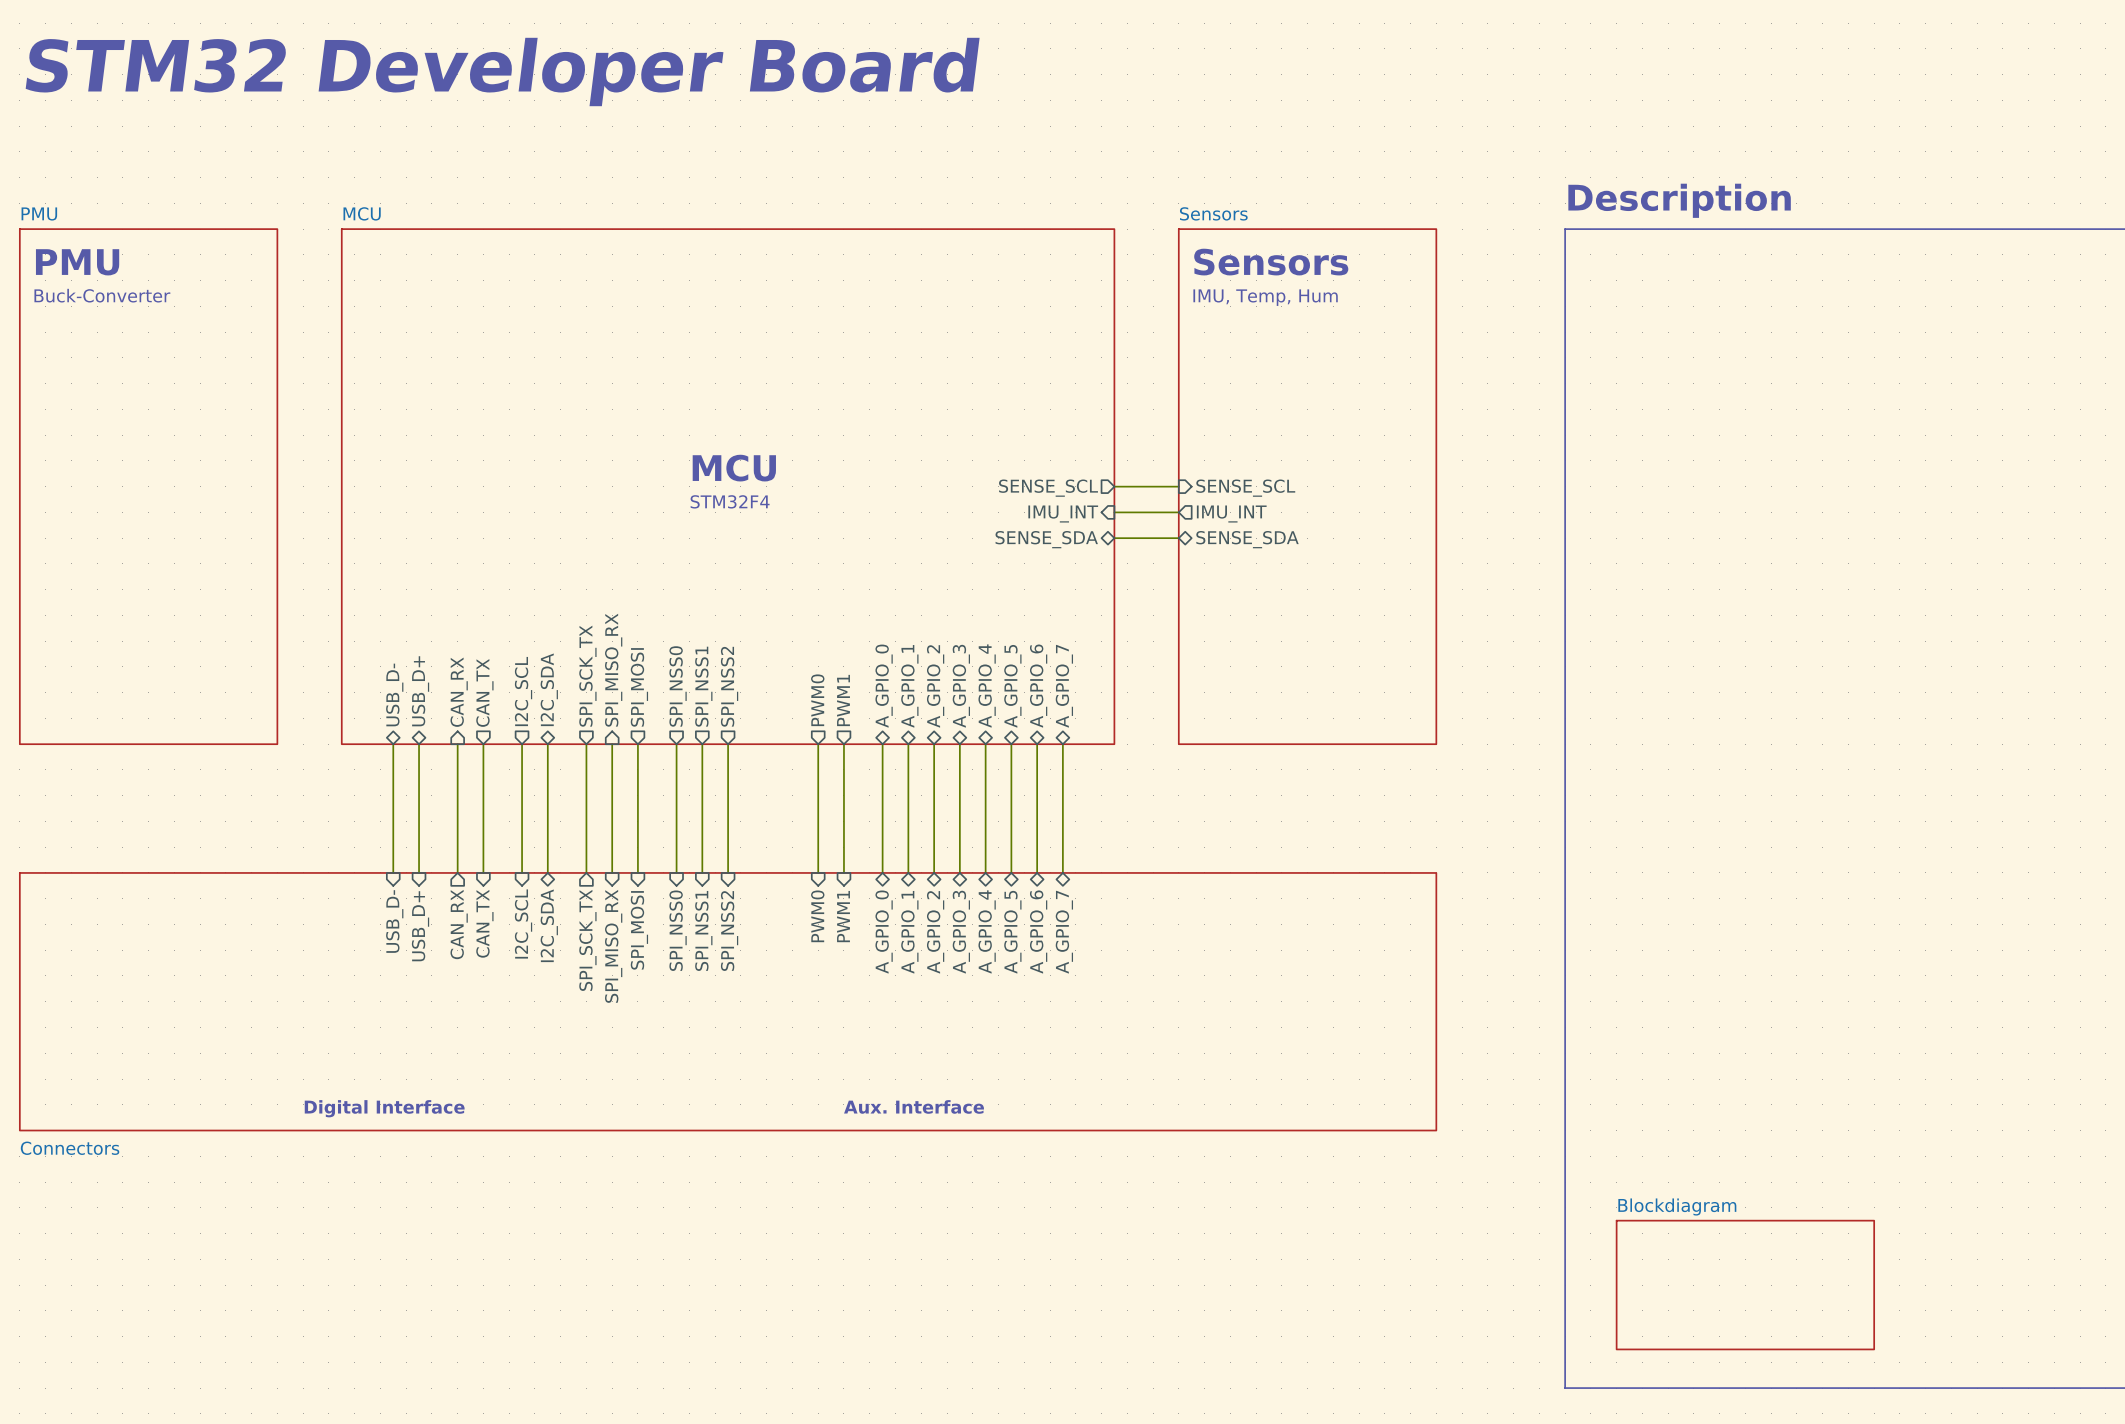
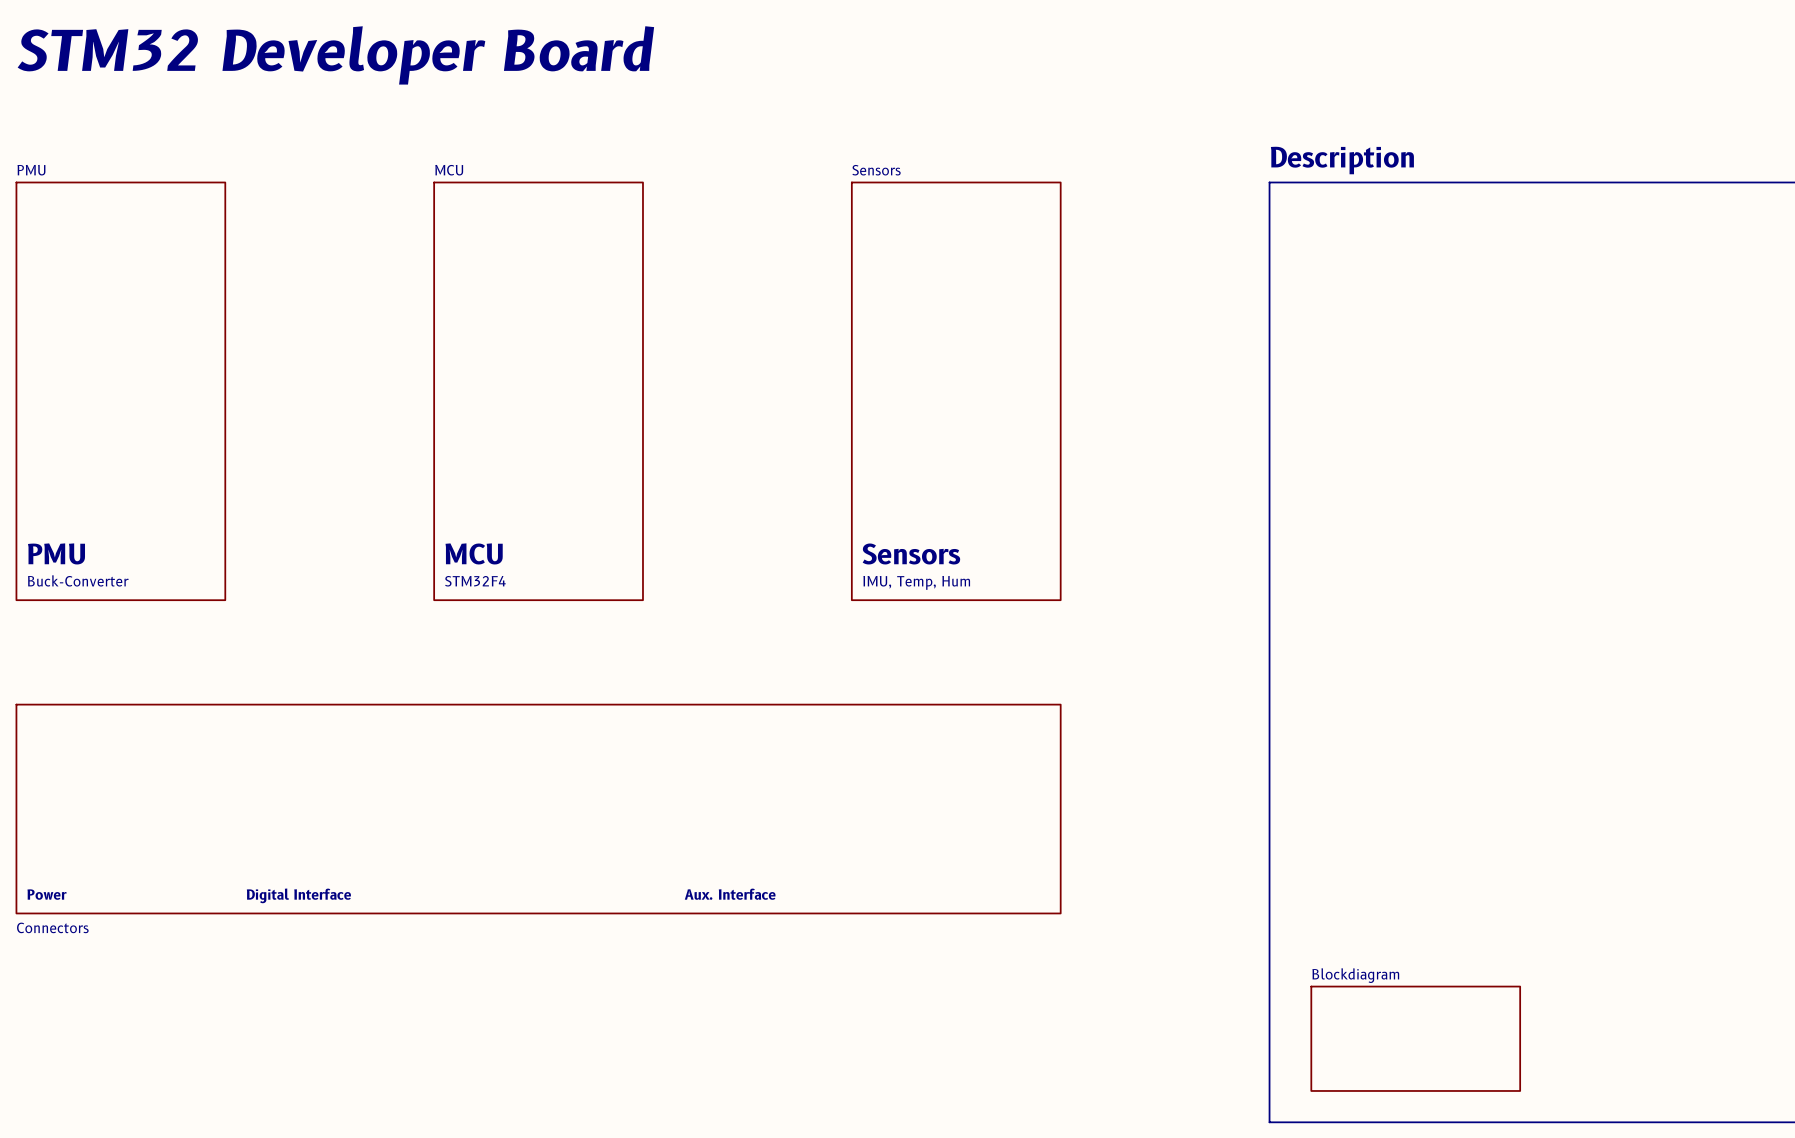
text: PMU (77, 262) -> none
text: Sensors (1271, 262) -> none
text: Buck-Converter (102, 295) -> none
text: IMU, Temp, Hum (1265, 297) -> none
text: MCU (734, 468) -> none
sheet MCU: none -> (538, 391)
sheet MCU: (728, 486) -> none
wire: (1114, 486) (1178, 486) -> none
sheet Sensors position: (1307, 486) -> (956, 391)
sheet pin: SENSE_SCL (1048, 488) -> none
sheet pin: SENSE_SCL (1245, 488) -> none
text: STM32F4 (730, 501) -> none
wire: (1114, 512) (1178, 512) -> none
sheet pin: IMU_INT (1063, 514) -> none
sheet pin: IMU_INT (1231, 514) -> none
wire: (1114, 538) (1178, 538) -> none
sheet pin: SENSE_SDA (1046, 539) -> none
sheet pin: SENSE_SDA (1247, 539) -> none
sheet pin: SPI_MISO_RX (613, 670) -> none
sheet pin: SPI_SCK_TX (587, 676) -> none
sheet pin: SPI_NSS0 (678, 686) -> none
sheet pin: SPI_NSS1 (703, 686) -> none
sheet pin: SPI_NSS2 (729, 686) -> none
sheet pin: A_GPIO_0 (884, 686) -> none
sheet pin: A_GPIO_1 (909, 686) -> none
sheet pin: A_GPIO_2 (935, 686) -> none
sheet pin: A_GPIO_3 (961, 686) -> none
sheet pin: A_GPIO_4 (987, 686) -> none
sheet pin: A_GPIO_5 (1012, 686) -> none
sheet pin: A_GPIO_6 (1038, 686) -> none
sheet pin: A_GPIO_7 (1064, 686) -> none
text: none -> PMU (56, 553)
text: none -> MCU (474, 553)
sheet pin: SPI_MOSI (639, 687) -> none
text: none -> Sensors (911, 553)
sheet pin: I2C_SDA (549, 689) -> none
sheet pin: USB_D+ (420, 691) -> none
sheet pin: I2C_SCL (523, 691) -> none
sheet pin: CAN_RX (459, 692) -> none
sheet pin: CAN_TX (484, 692) -> none
sheet pin: USB_D- (394, 694) -> none
sheet pin: PWM0 (817, 700) -> none
sheet pin: PWM1 (843, 700) -> none
text: none -> Buck-Converter (78, 580)
text: none -> STM32F4 (475, 581)
text: none -> IMU, Temp, Hum (916, 582)
wire: (393, 744) (393, 872) -> none
wire: (419, 744) (419, 872) -> none
wire: (457, 744) (457, 872) -> none
wire: (483, 744) (483, 872) -> none
wire: (522, 744) (522, 872) -> none
wire: (547, 744) (547, 872) -> none
wire: (586, 744) (586, 872) -> none
wire: (612, 744) (612, 872) -> none
wire: (637, 744) (637, 872) -> none
wire: (676, 744) (676, 872) -> none
wire: (702, 744) (702, 872) -> none
wire: (728, 744) (728, 872) -> none
wire: (818, 744) (818, 872) -> none
wire: (843, 744) (843, 872) -> none
wire: (882, 744) (882, 872) -> none
wire: (908, 744) (908, 872) -> none
wire: (934, 744) (934, 872) -> none
wire: (959, 744) (959, 872) -> none
wire: (985, 744) (985, 872) -> none
wire: (1011, 744) (1011, 872) -> none
wire: (1037, 744) (1037, 872) -> none
wire: (1062, 744) (1062, 872) -> none
sheet pin: PWM0 (817, 916) -> none
sheet pin: PWM1 (843, 916) -> none
sheet pin: USB_D- (394, 921) -> none
sheet pin: CAN_TX (484, 923) -> none
sheet pin: CAN_RX (459, 924) -> none
sheet pin: I2C_SCL (523, 924) -> none
sheet pin: I2C_SDA (549, 925) -> none
sheet pin: USB_D+ (420, 926) -> none
sheet pin: SPI_MOSI (639, 930) -> none
sheet pin: SPI_NSS0 (678, 930) -> none
sheet pin: SPI_NSS1 (703, 930) -> none
sheet pin: SPI_NSS2 (729, 931) -> none
sheet pin: A_GPIO_4 (987, 931) -> none
sheet pin: A_GPIO_0 (884, 932) -> none
sheet pin: A_GPIO_1 (909, 932) -> none
sheet pin: A_GPIO_2 (935, 932) -> none
sheet pin: A_GPIO_3 (961, 932) -> none
sheet pin: A_GPIO_5 (1012, 932) -> none
sheet pin: A_GPIO_6 (1038, 932) -> none
sheet pin: A_GPIO_7 (1064, 932) -> none
sheet pin: SPI_SCK_TX (587, 940) -> none
sheet pin: SPI_MISO_RX (613, 946) -> none
sheet Connectors: none -> (538, 809)
sheet Connectors: (728, 1001) -> none
text: none -> Power (47, 894)

